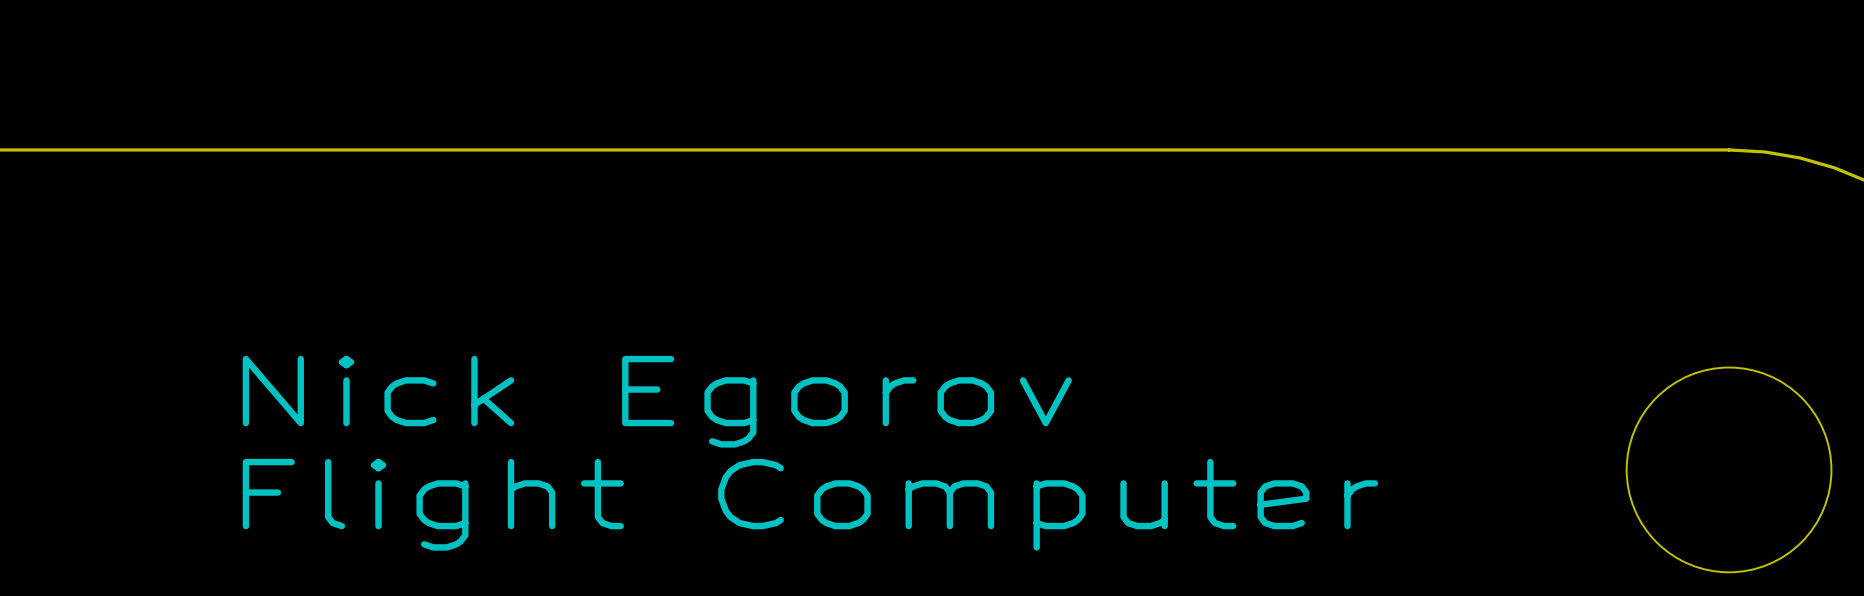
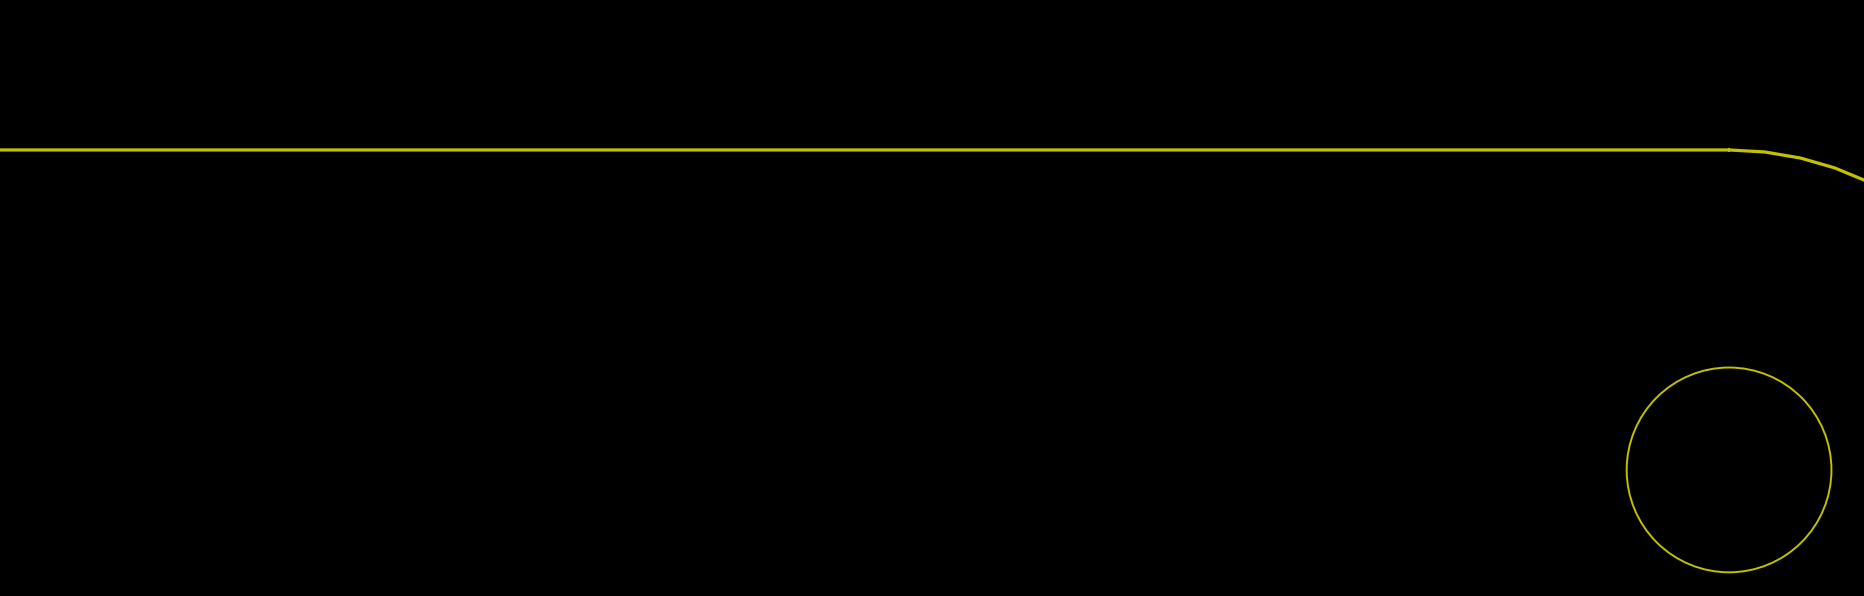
text: Nick Egorov (657, 401) -> none
text: Flight Computer (810, 504) -> none

